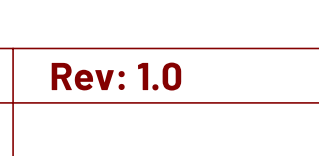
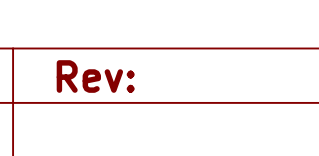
title block: Rev: 1.0 (116, 76) -> Rev: (95, 76)

